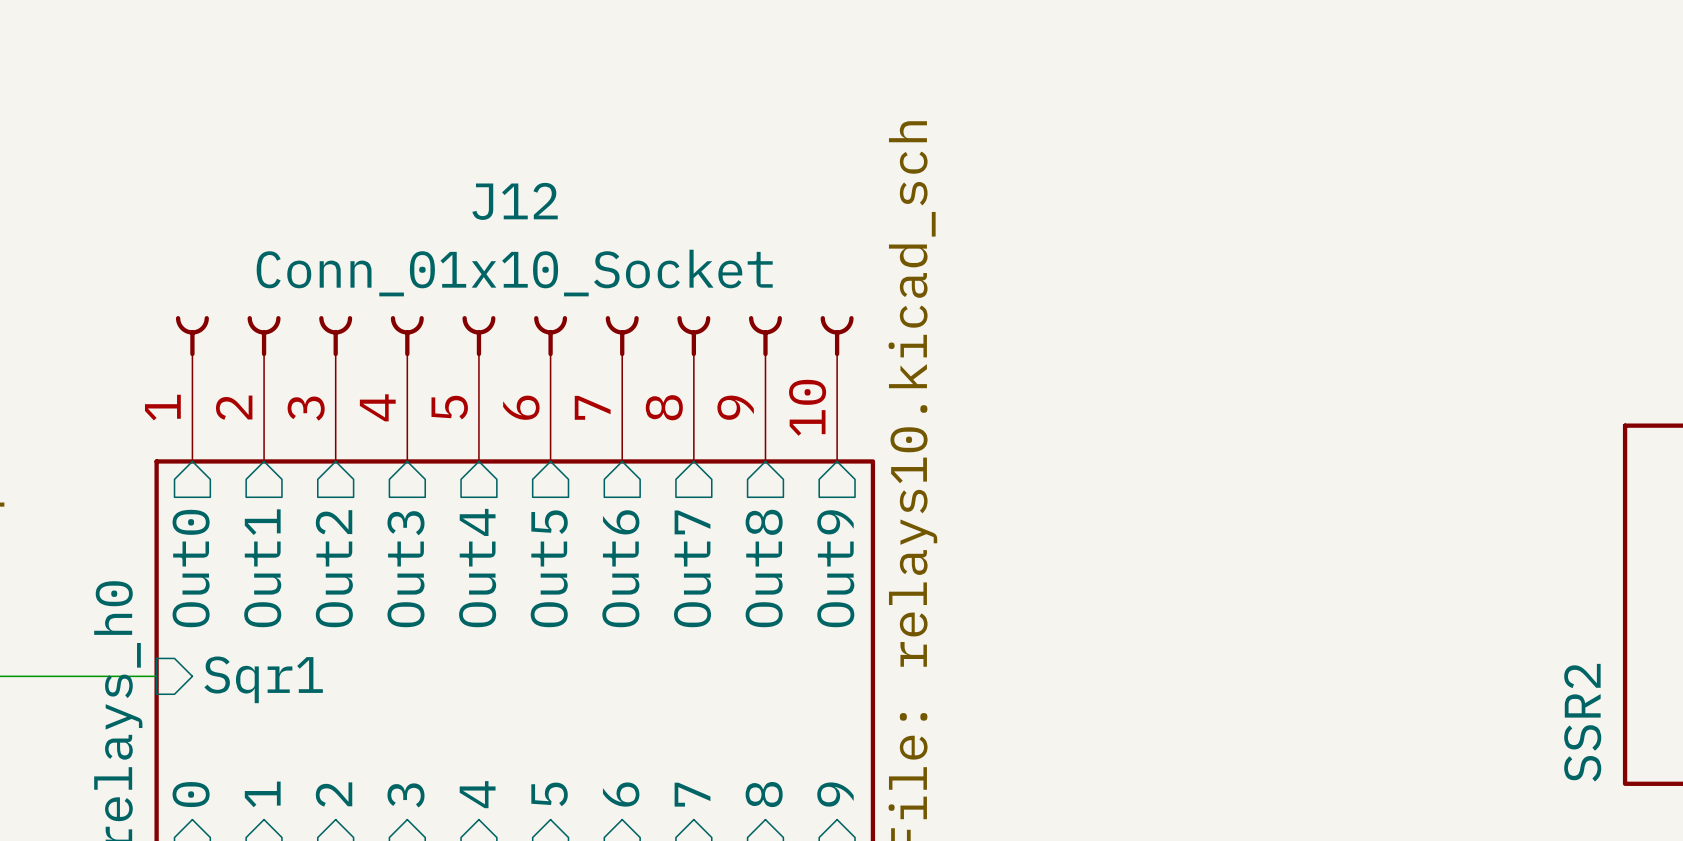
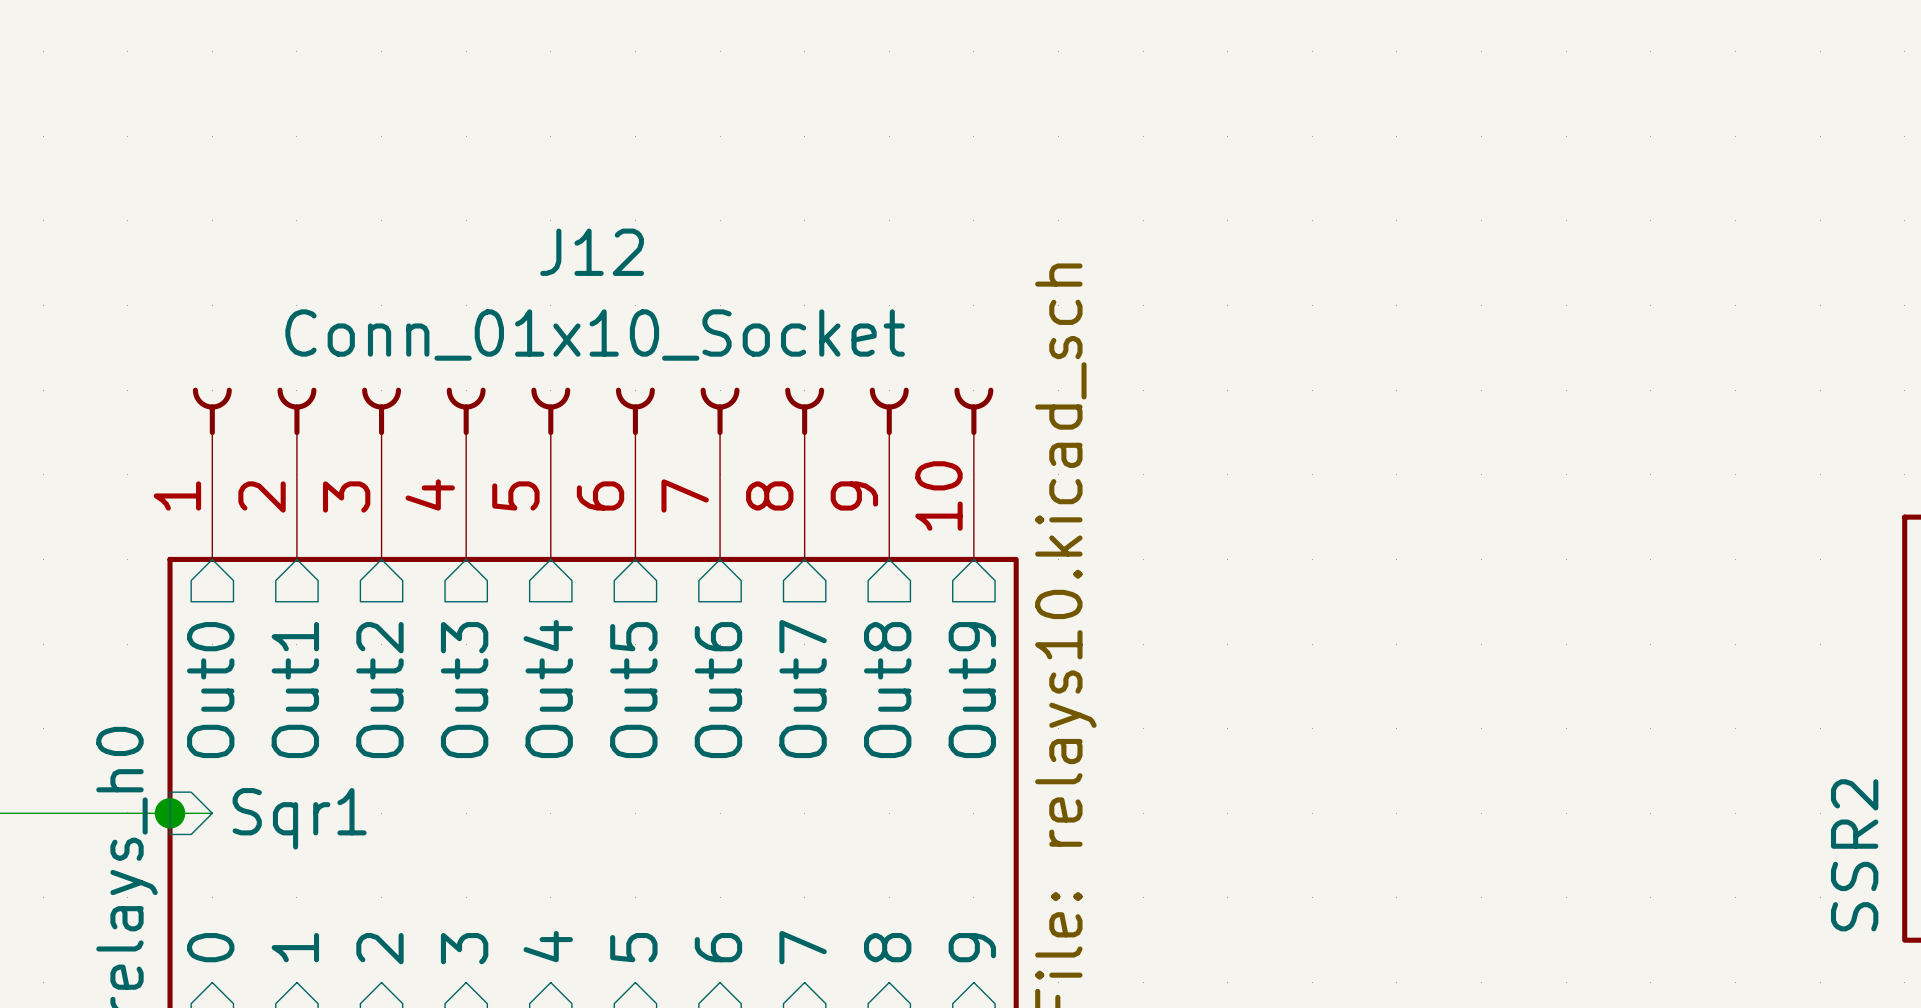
wire: none -> (170, 813) (212, 813)
junction: none -> (170, 813)

